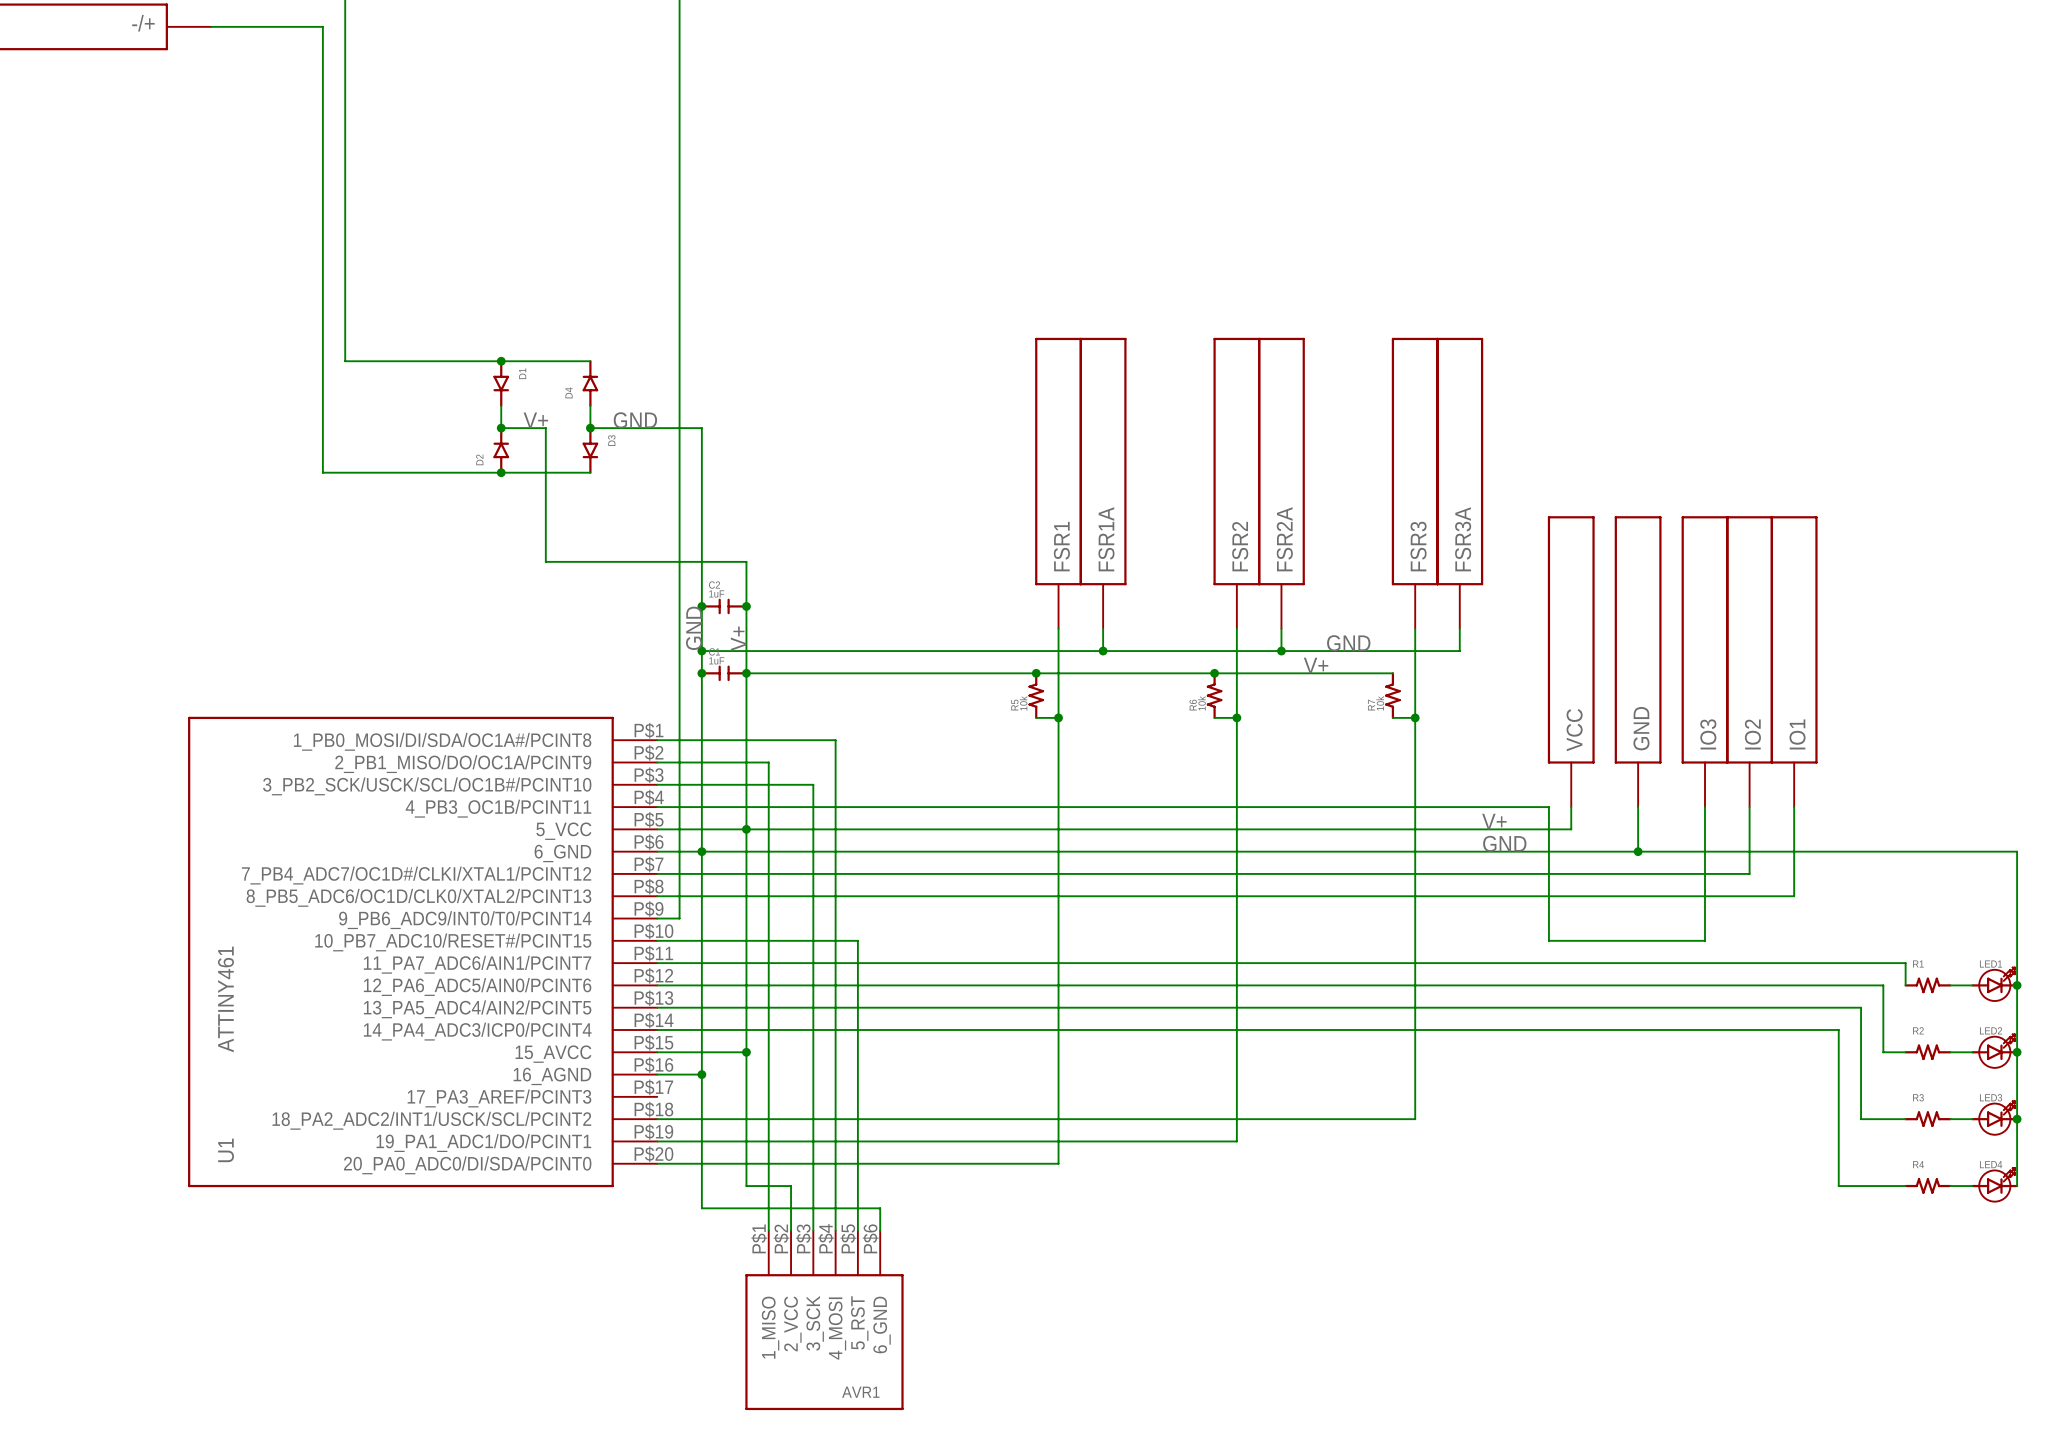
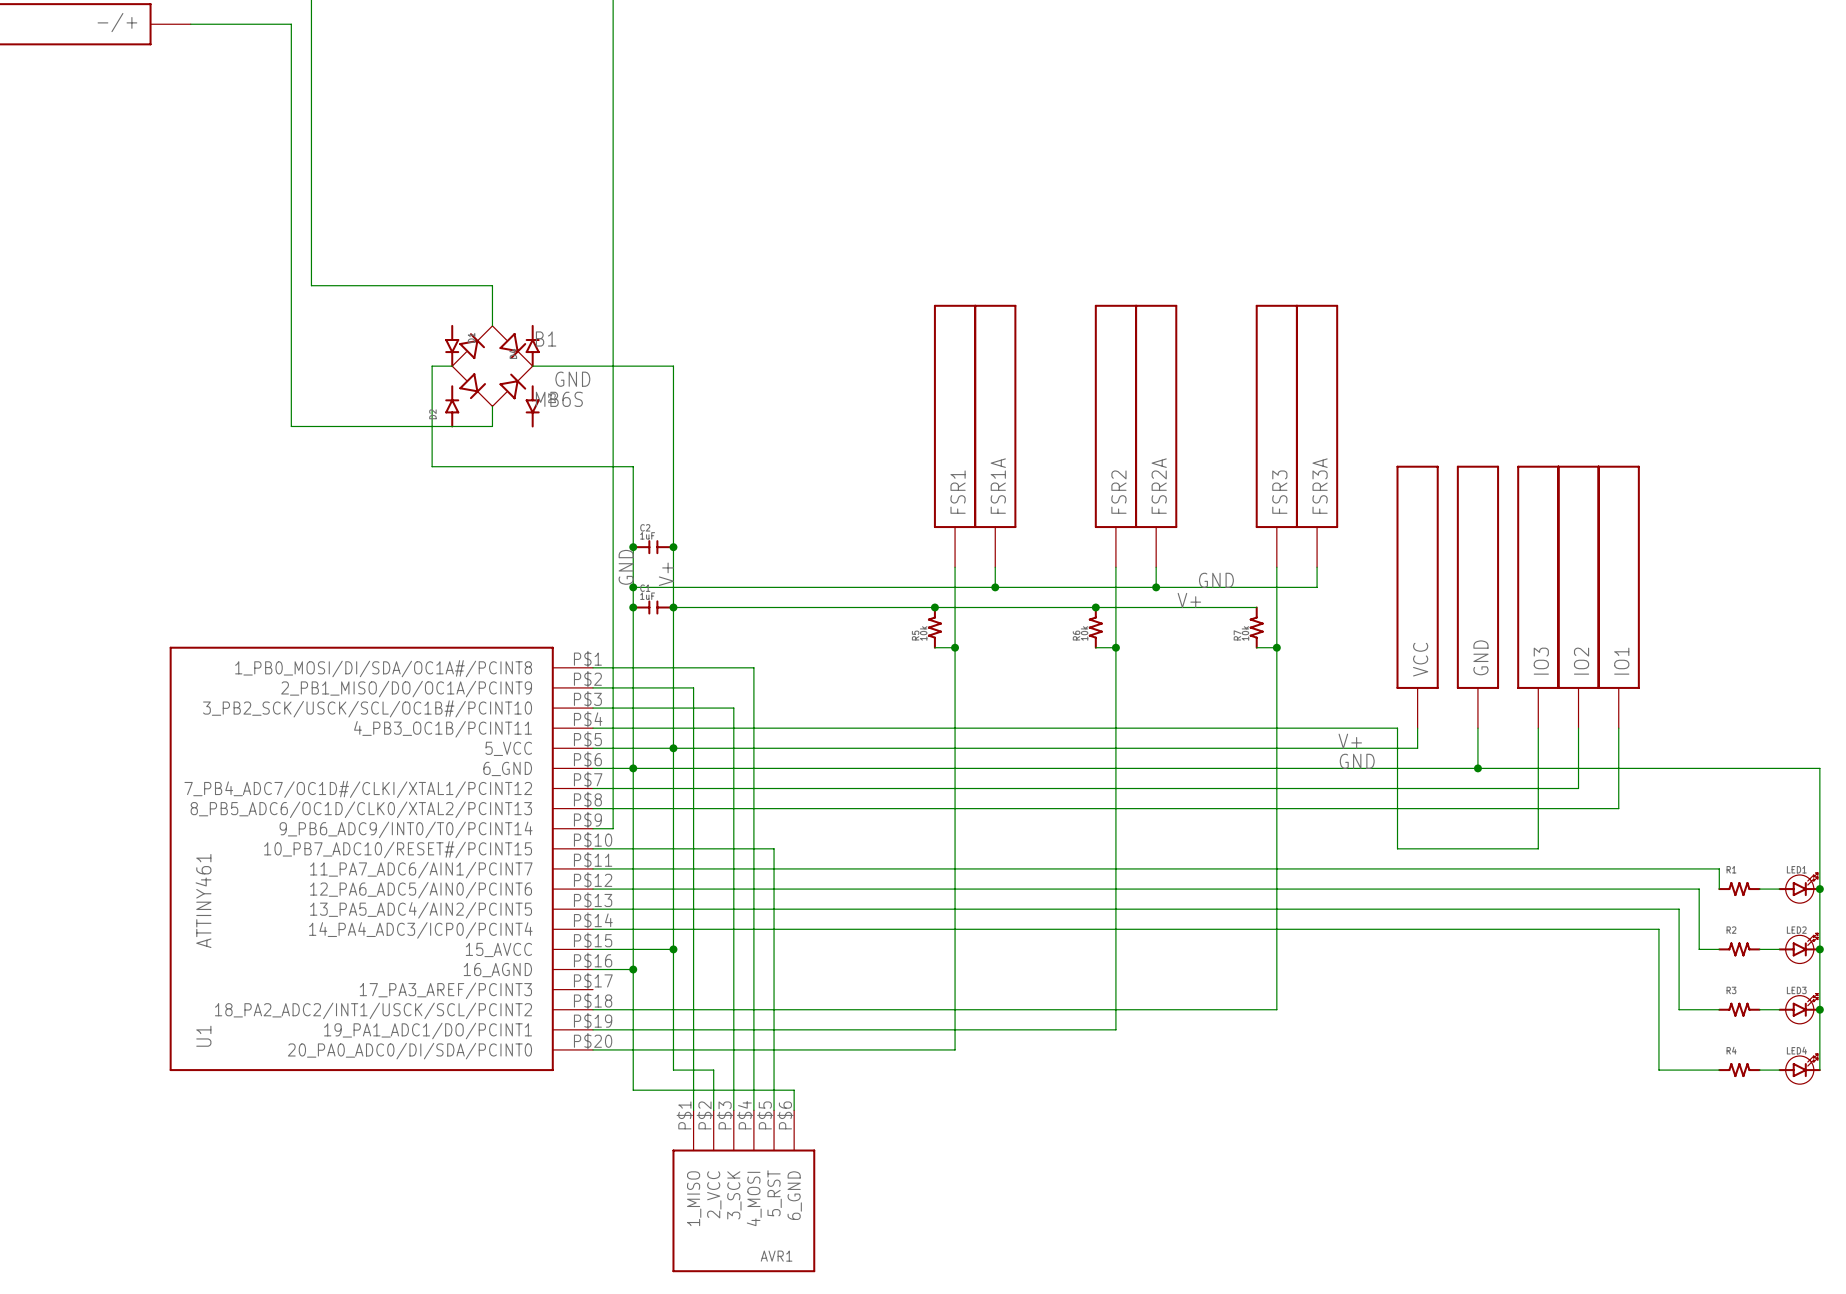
wire: (345, 316) (345, 361) (590, 361) -> (311, 285) (492, 285) (492, 325)
junction: (501, 361) -> none
wire: (501, 405) (501, 428) (545, 428) (545, 450) -> (452, 366) (432, 366) (432, 466) (633, 466)
B1: none -> MB6S (492, 366)
wire: (590, 405) (590, 428) (701, 428) (701, 517) -> (532, 366) (673, 366) (673, 506)
label: V+ (535, 420) -> none
junction: (501, 428) -> none
junction: (590, 428) -> none
junction: (501, 472) -> none
wire: (590, 472) (545, 472) (545, 561) (746, 561) -> none

